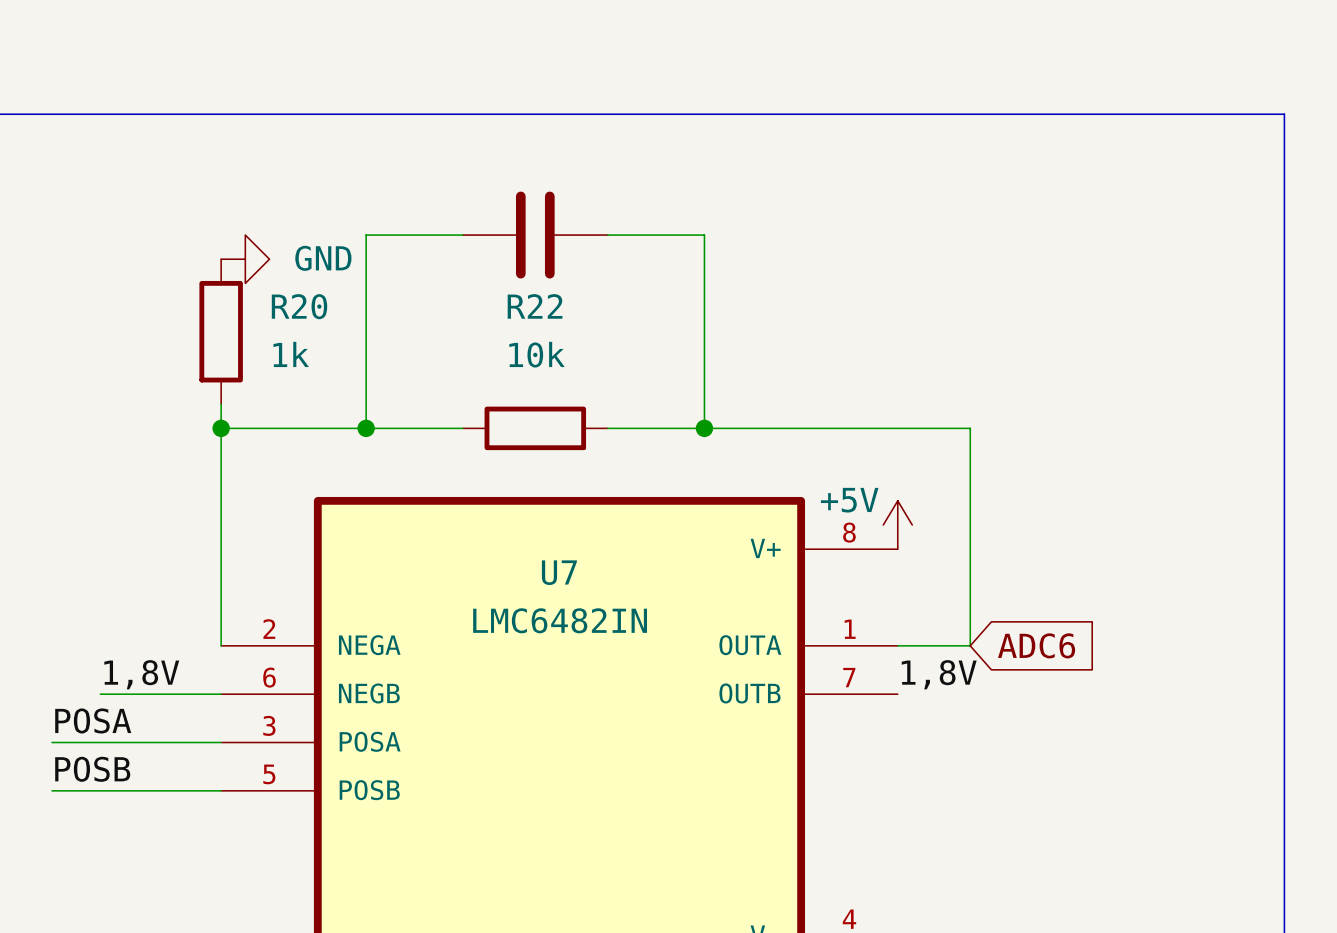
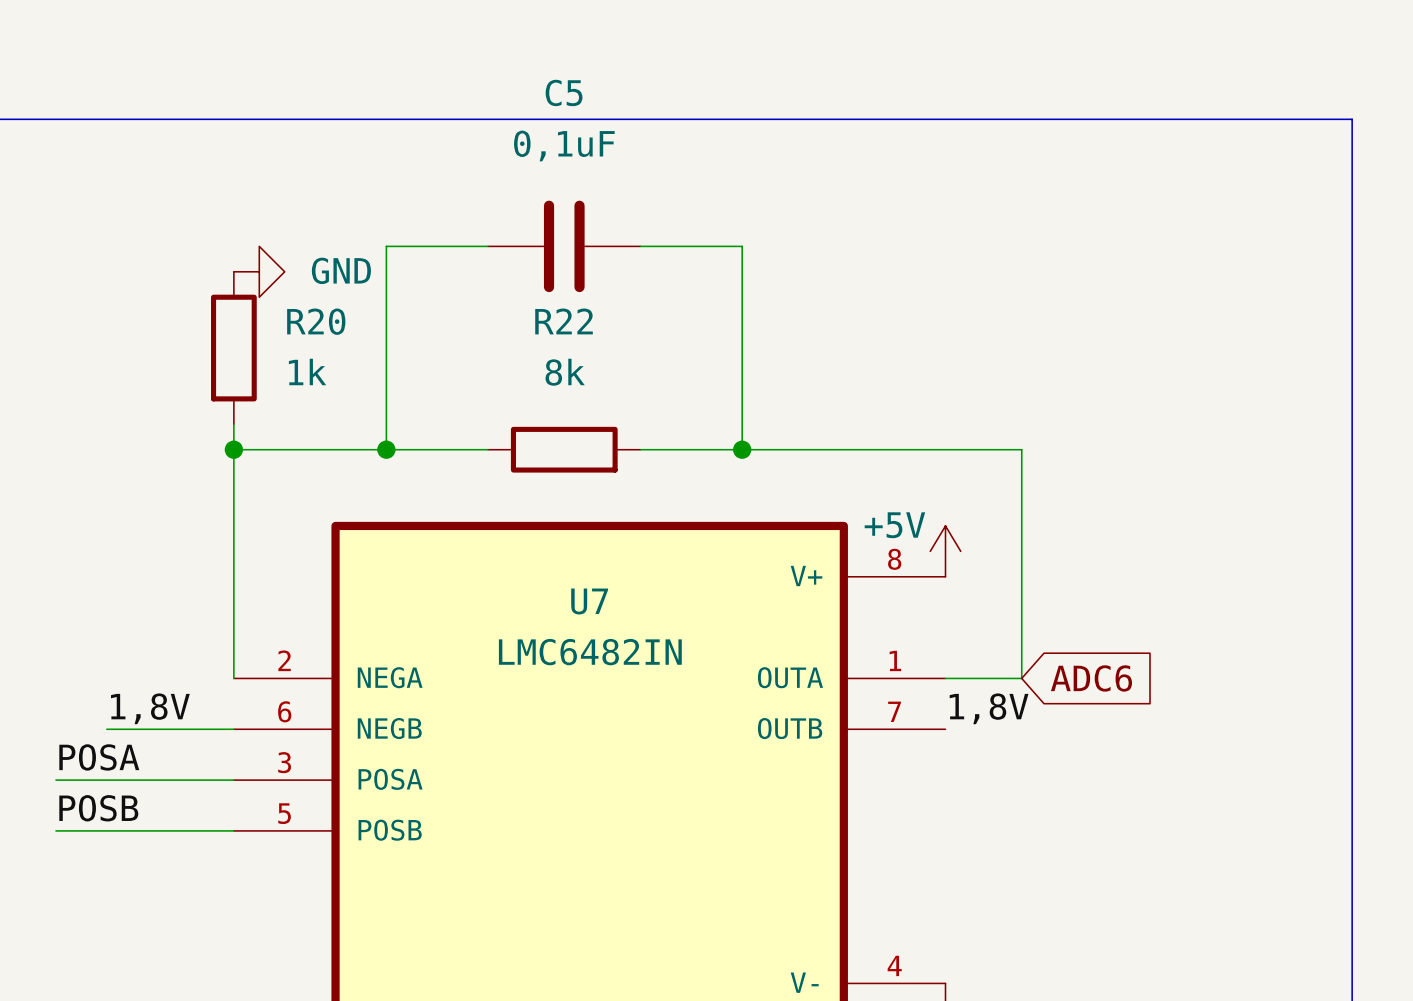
C5 name: none -> C5 (564, 92)
C5 value: none -> 0,1uF (564, 145)
R22 value: 10k (537, 354) -> 8k (565, 372)

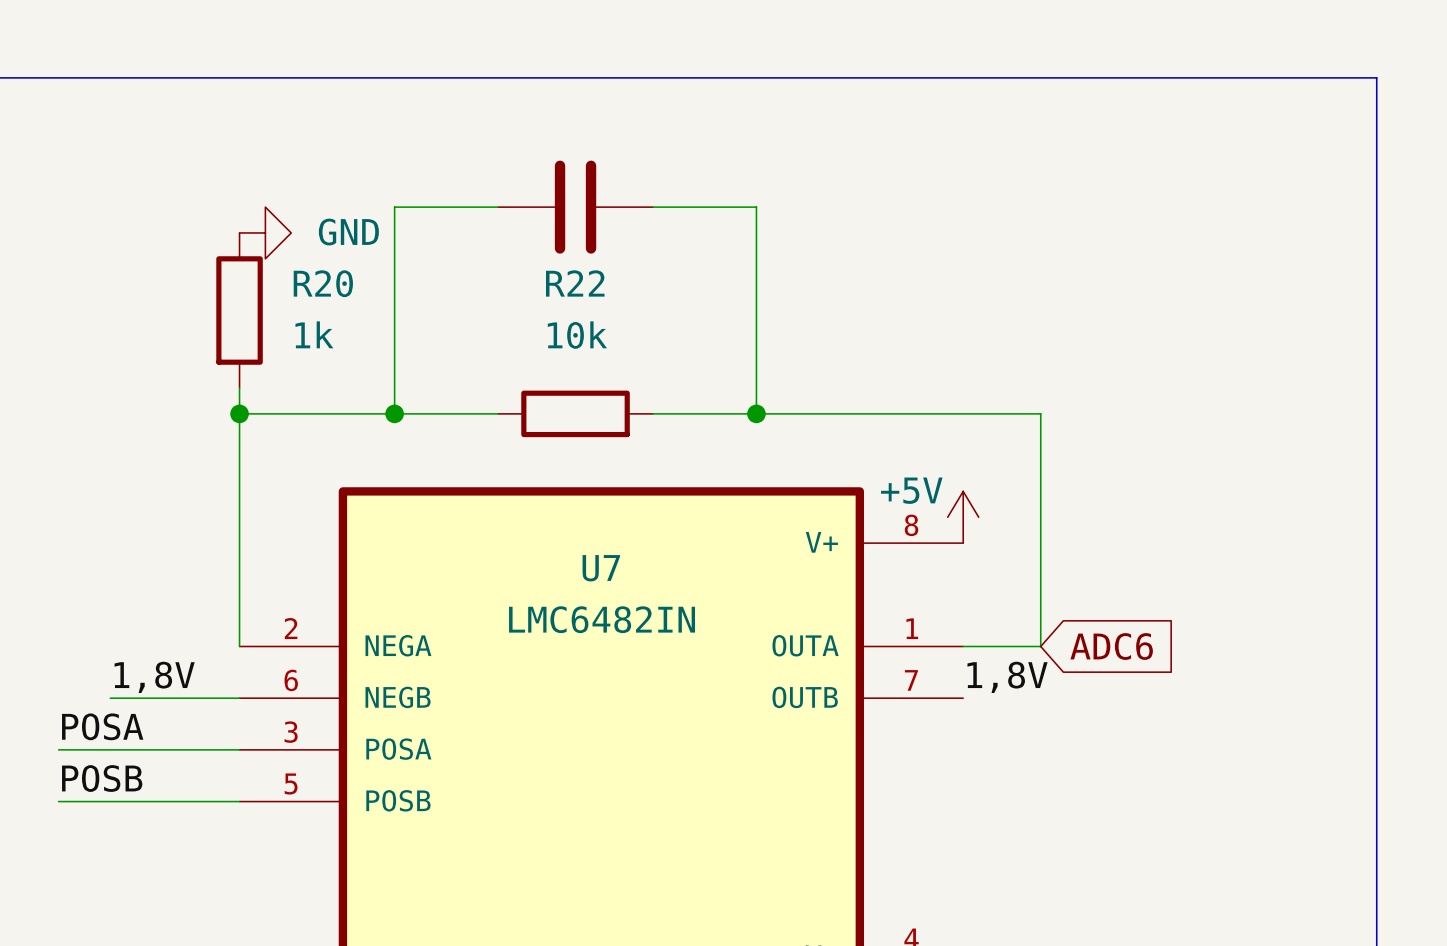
C5 name: C5 (564, 92) -> none
C5 value: 0,1uF (564, 145) -> none
R22 value: 8k (565, 372) -> 10k (577, 335)

